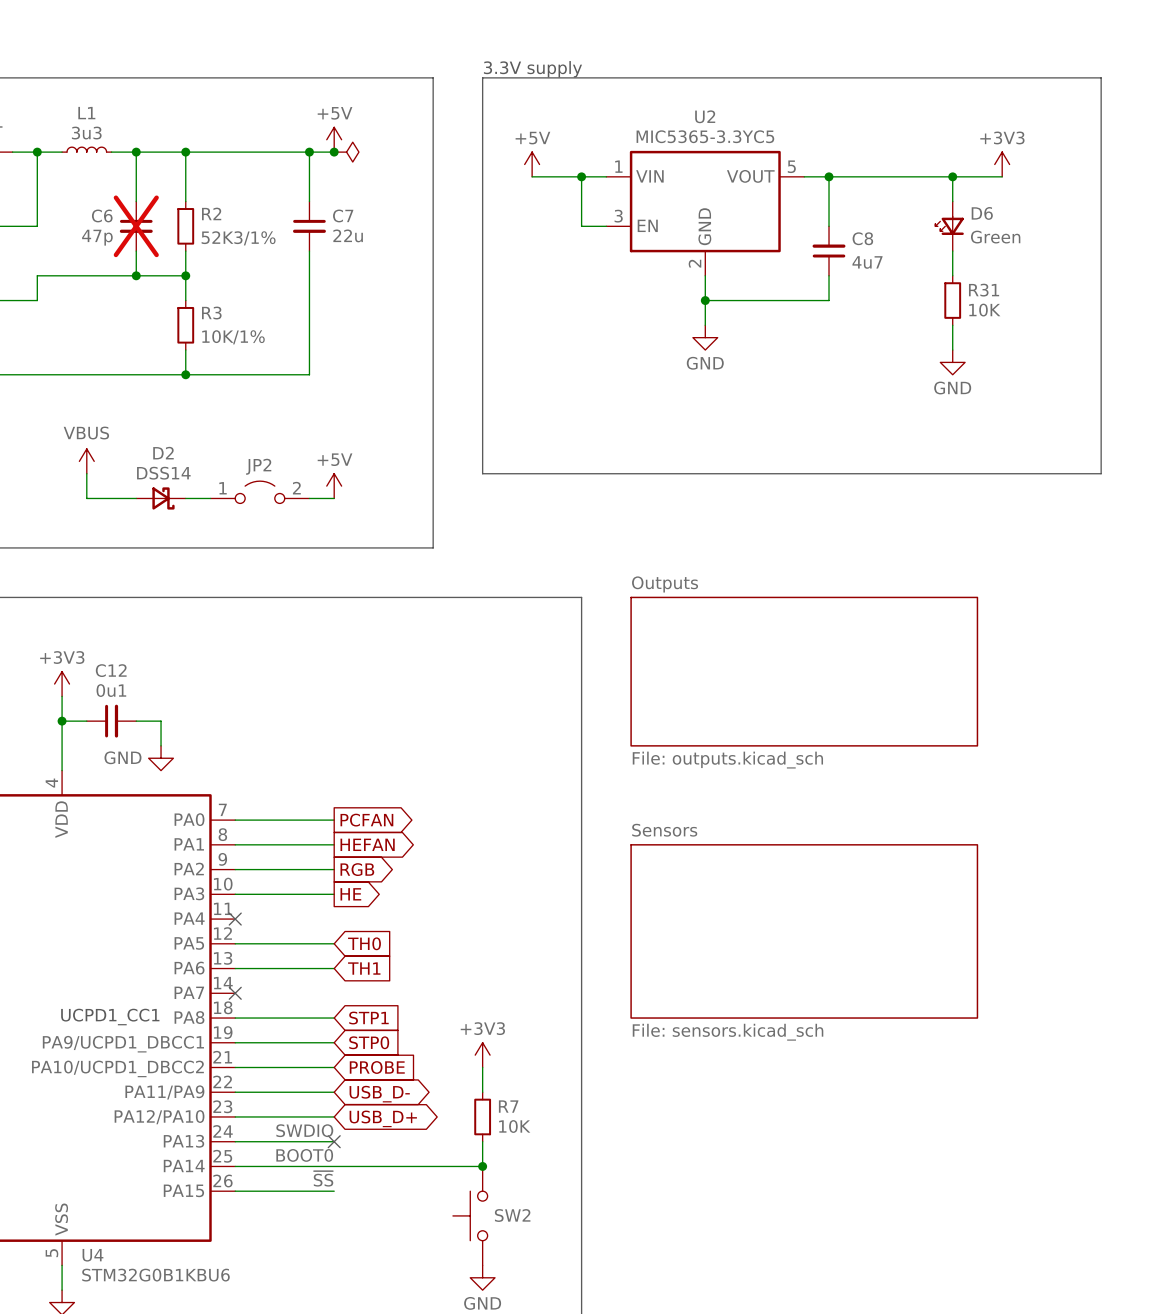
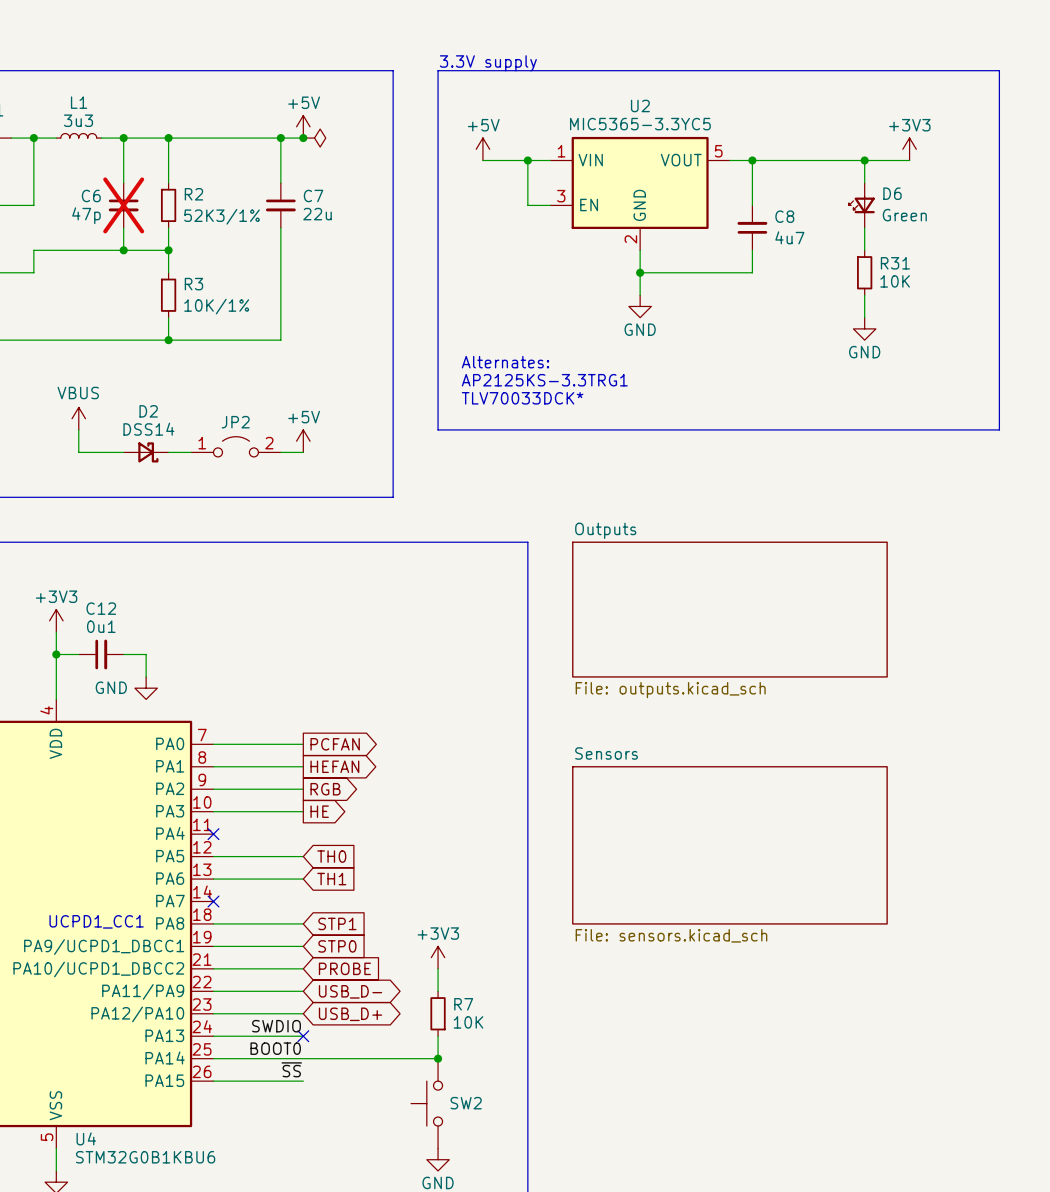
text: none -> Alternates: (505, 362)
text: none -> AP2125KS-3.3TRG1 (544, 380)
text: none -> TLV70033DCK* (522, 398)

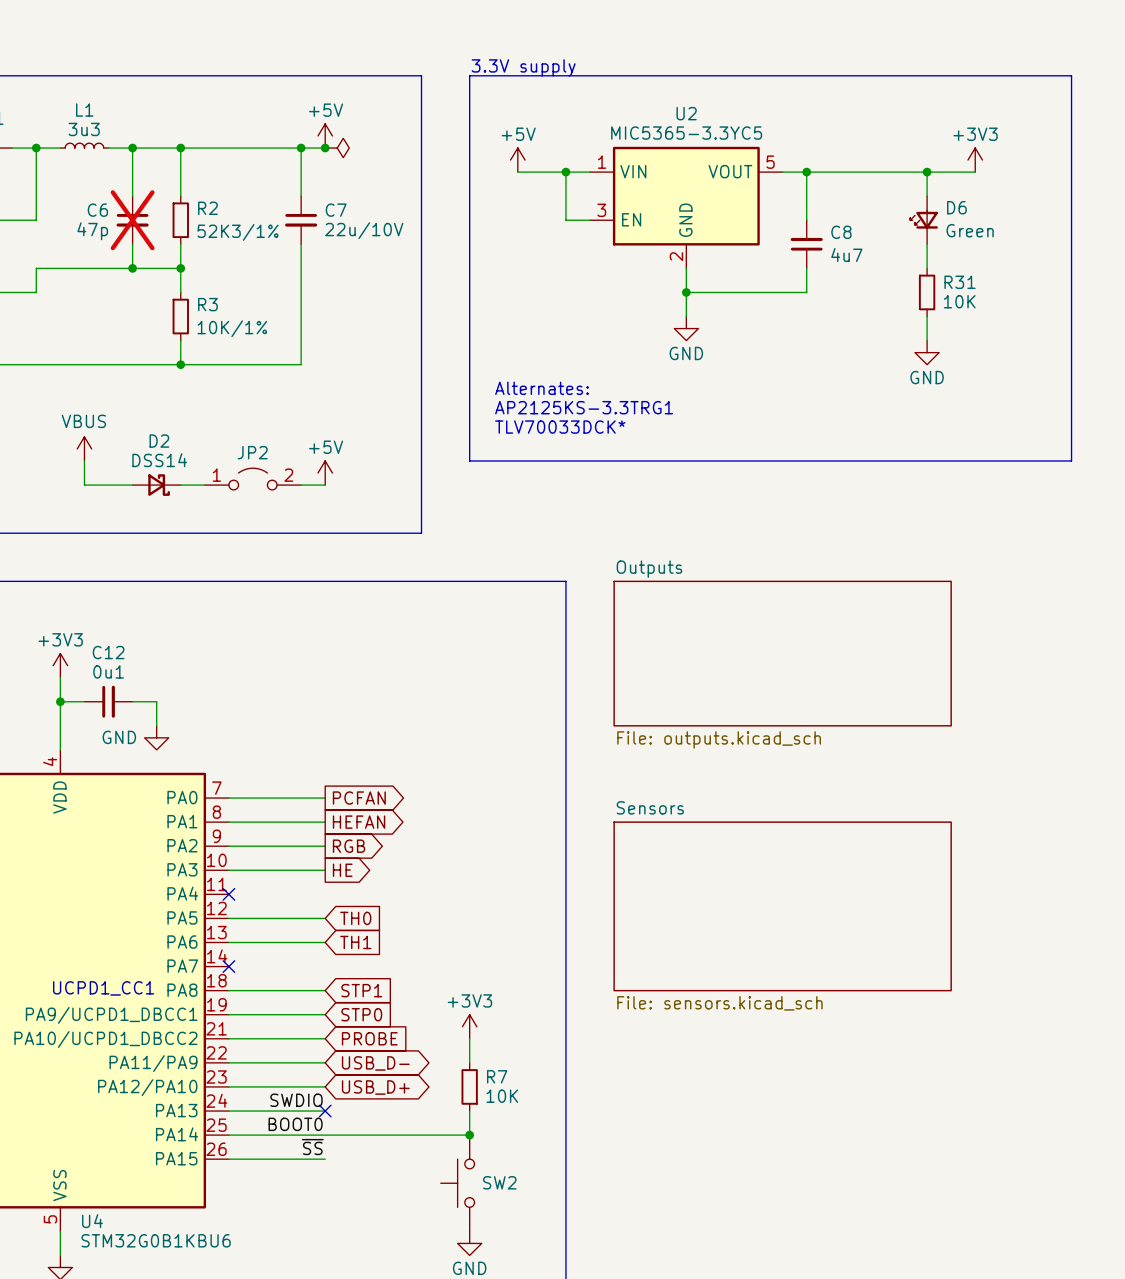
C7 value: 22u (317, 214) -> 22u/10V (364, 230)

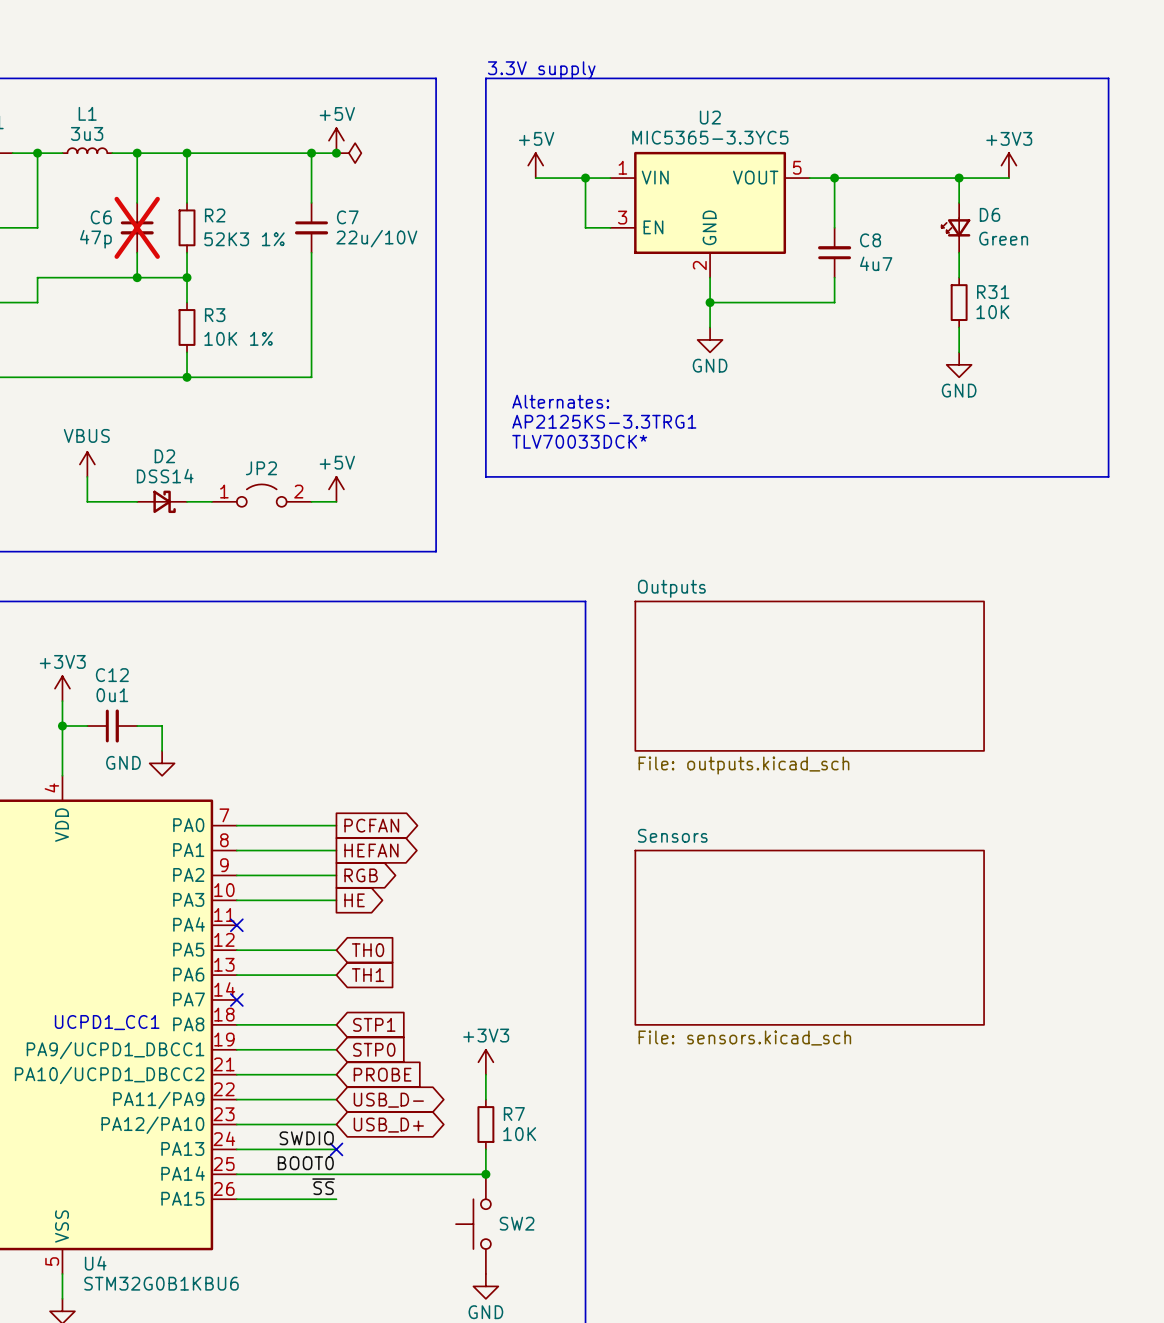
R2 value: 52K3/1% (238, 232) -> 52K3 1% (244, 239)
R3 value: 10K/1% (232, 328) -> 10K 1% (238, 338)

